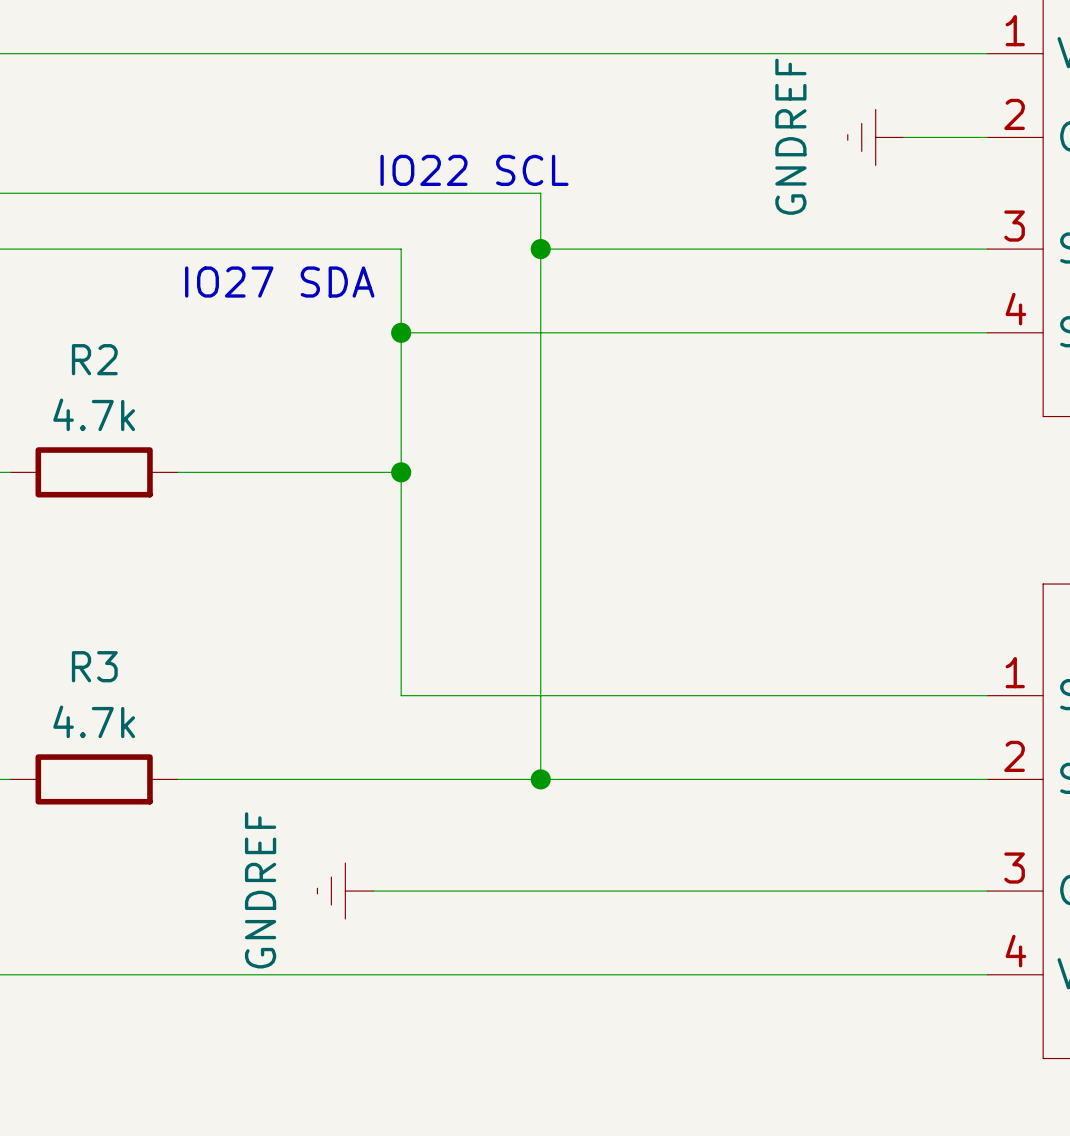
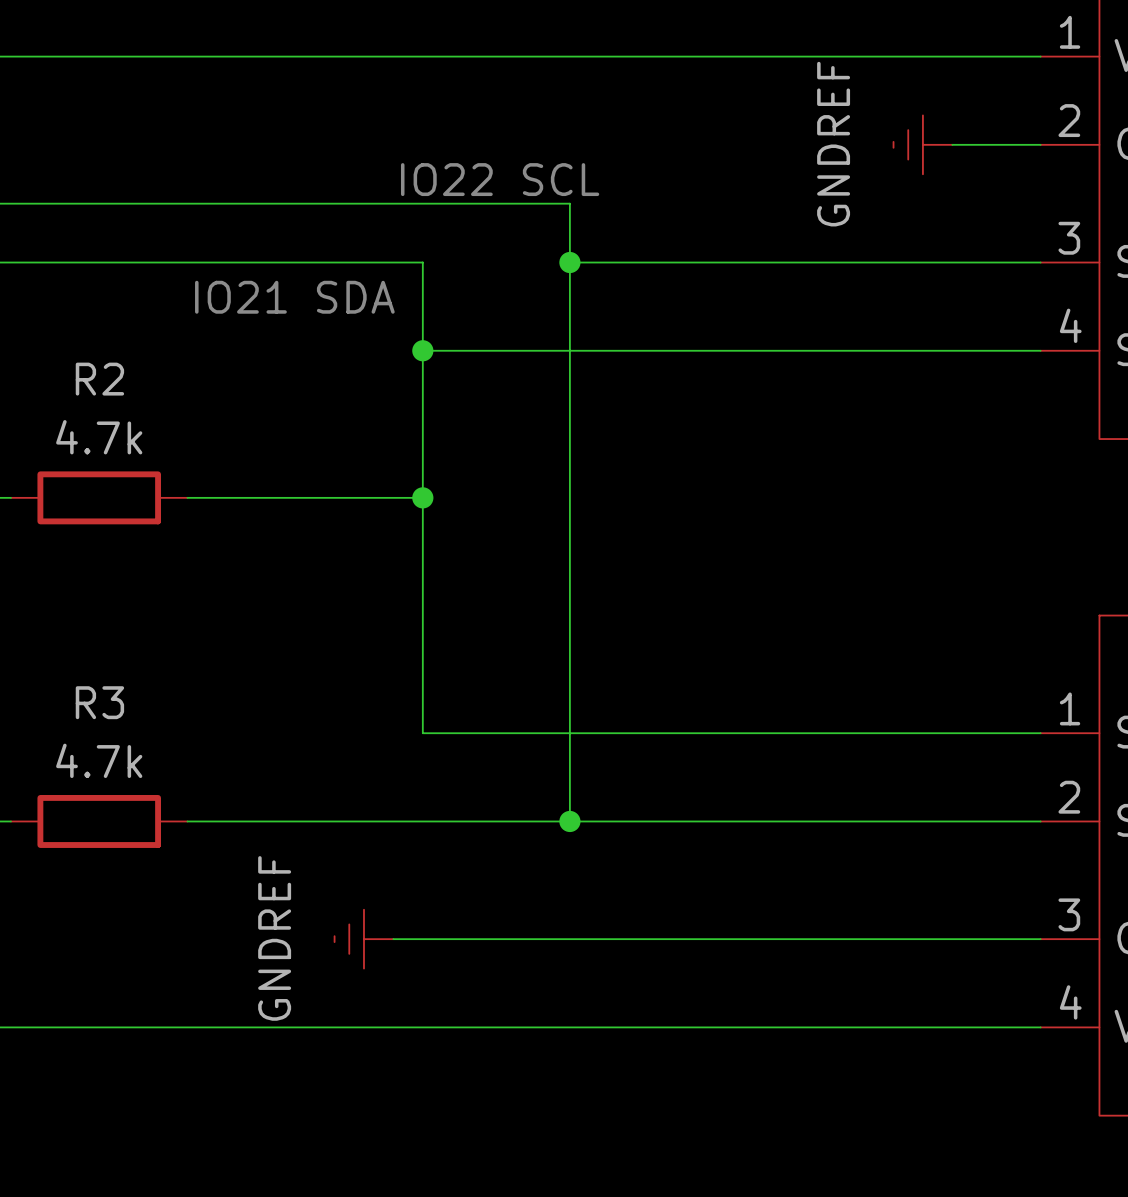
text: IO27 SDA (279, 282) -> IO21 SDA (294, 297)

